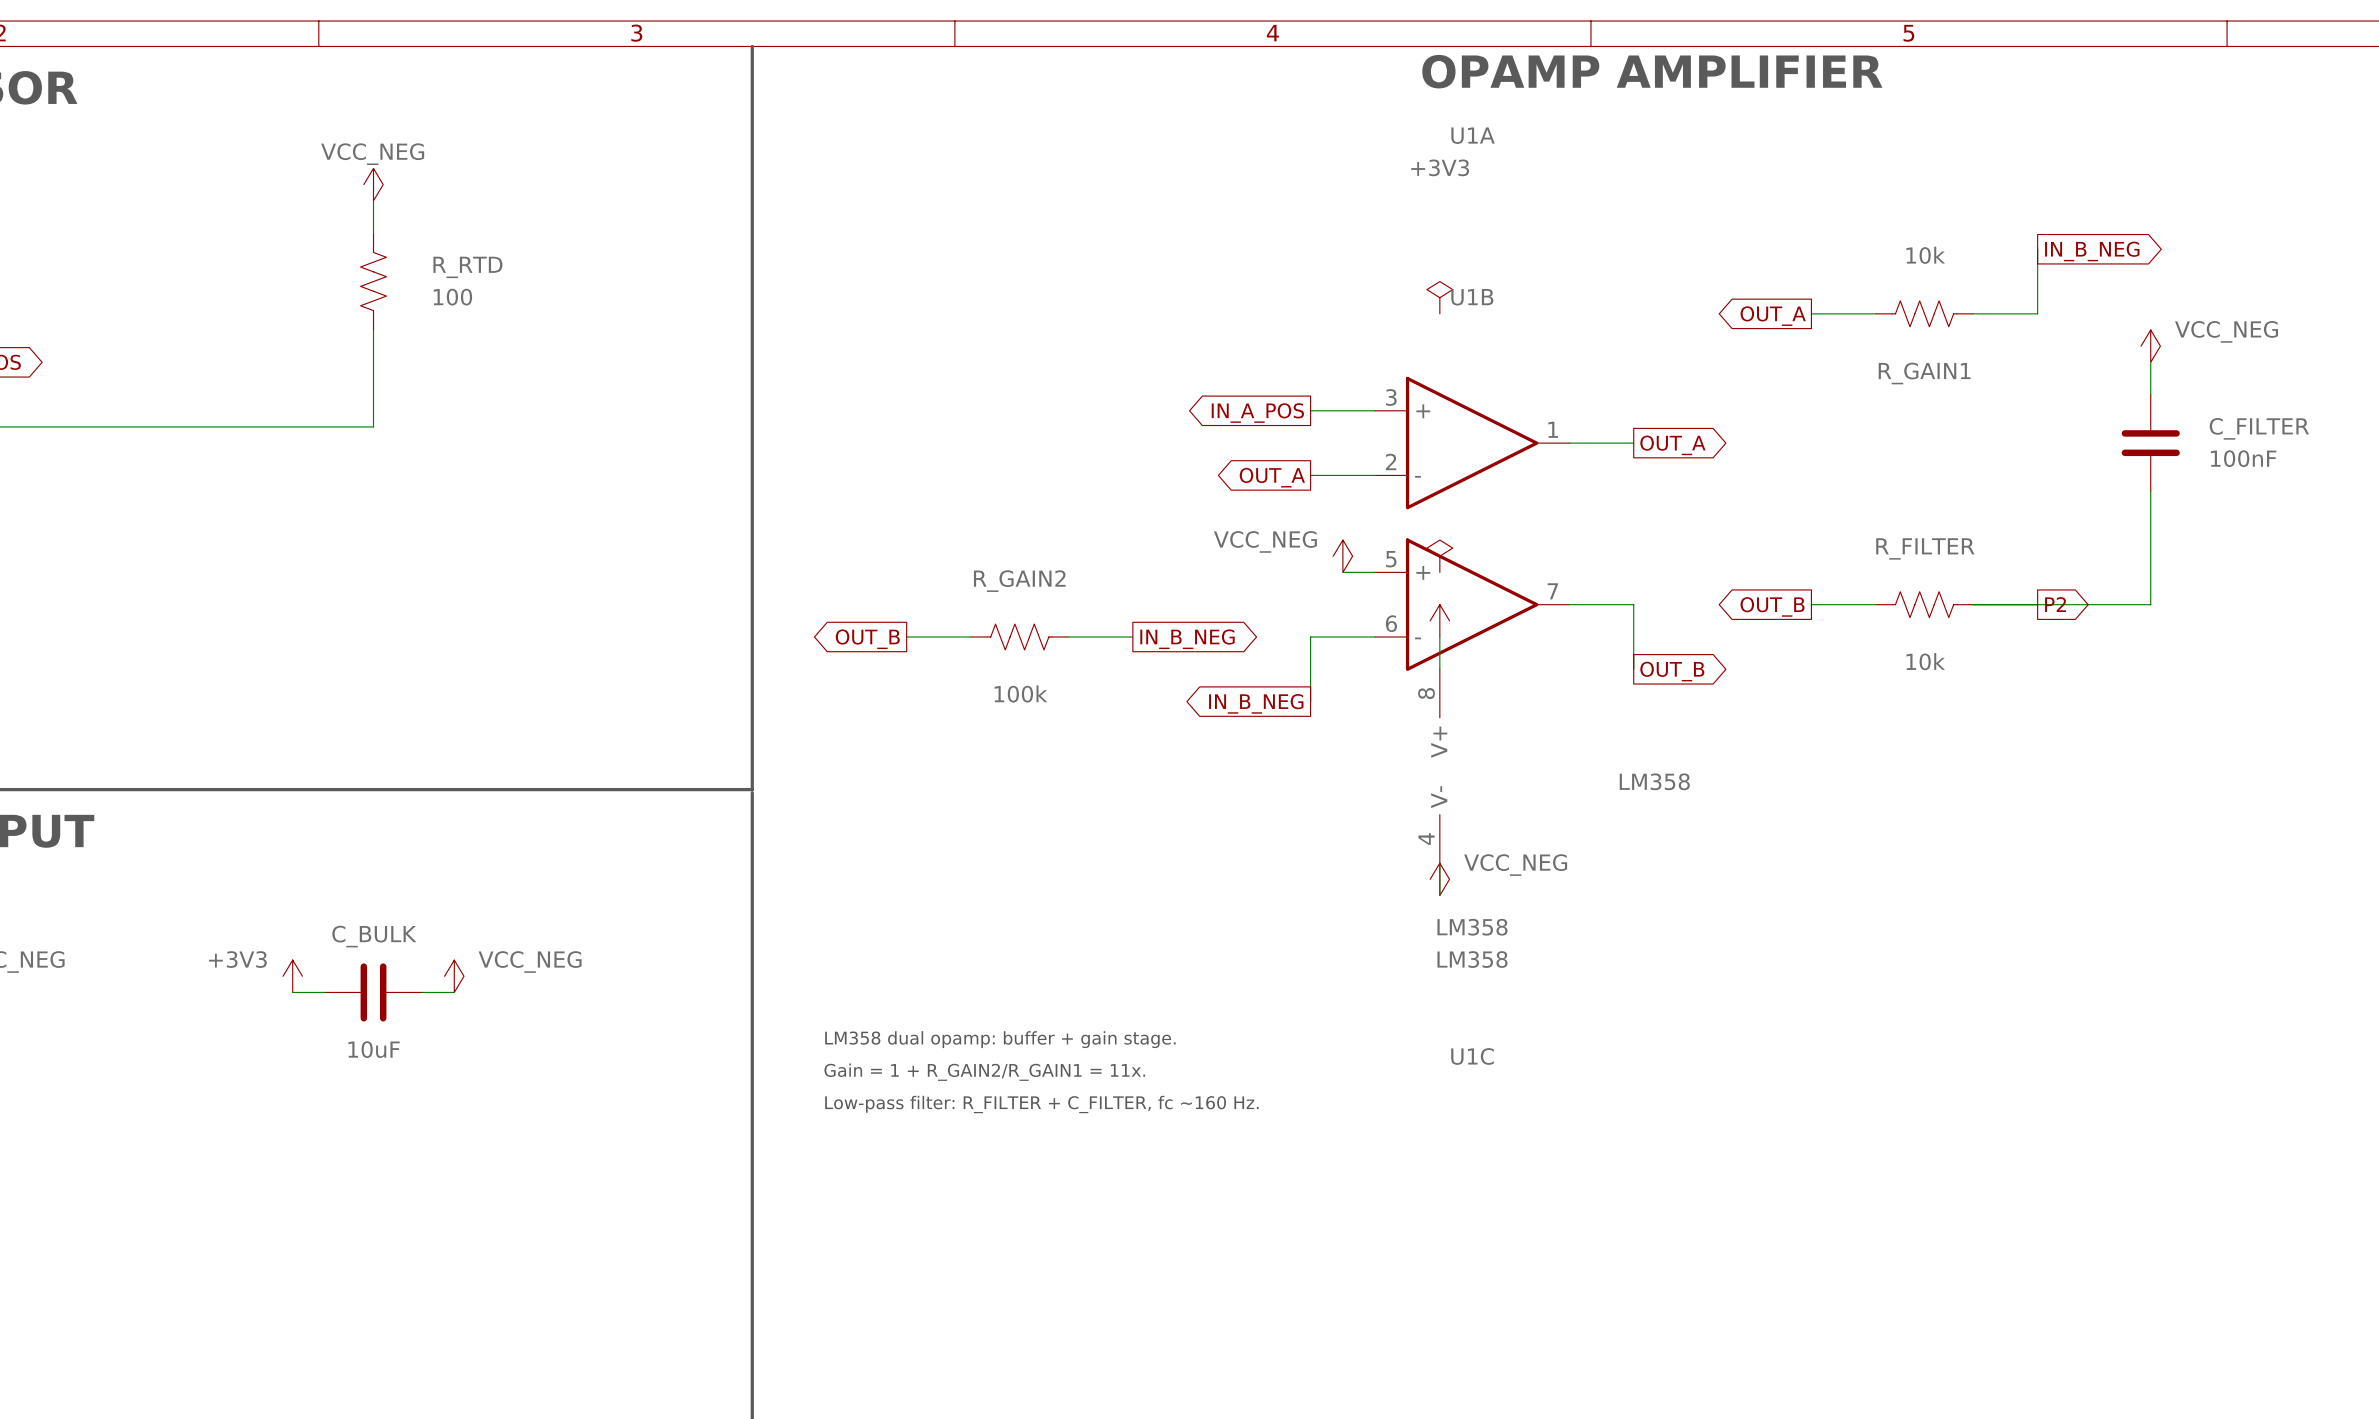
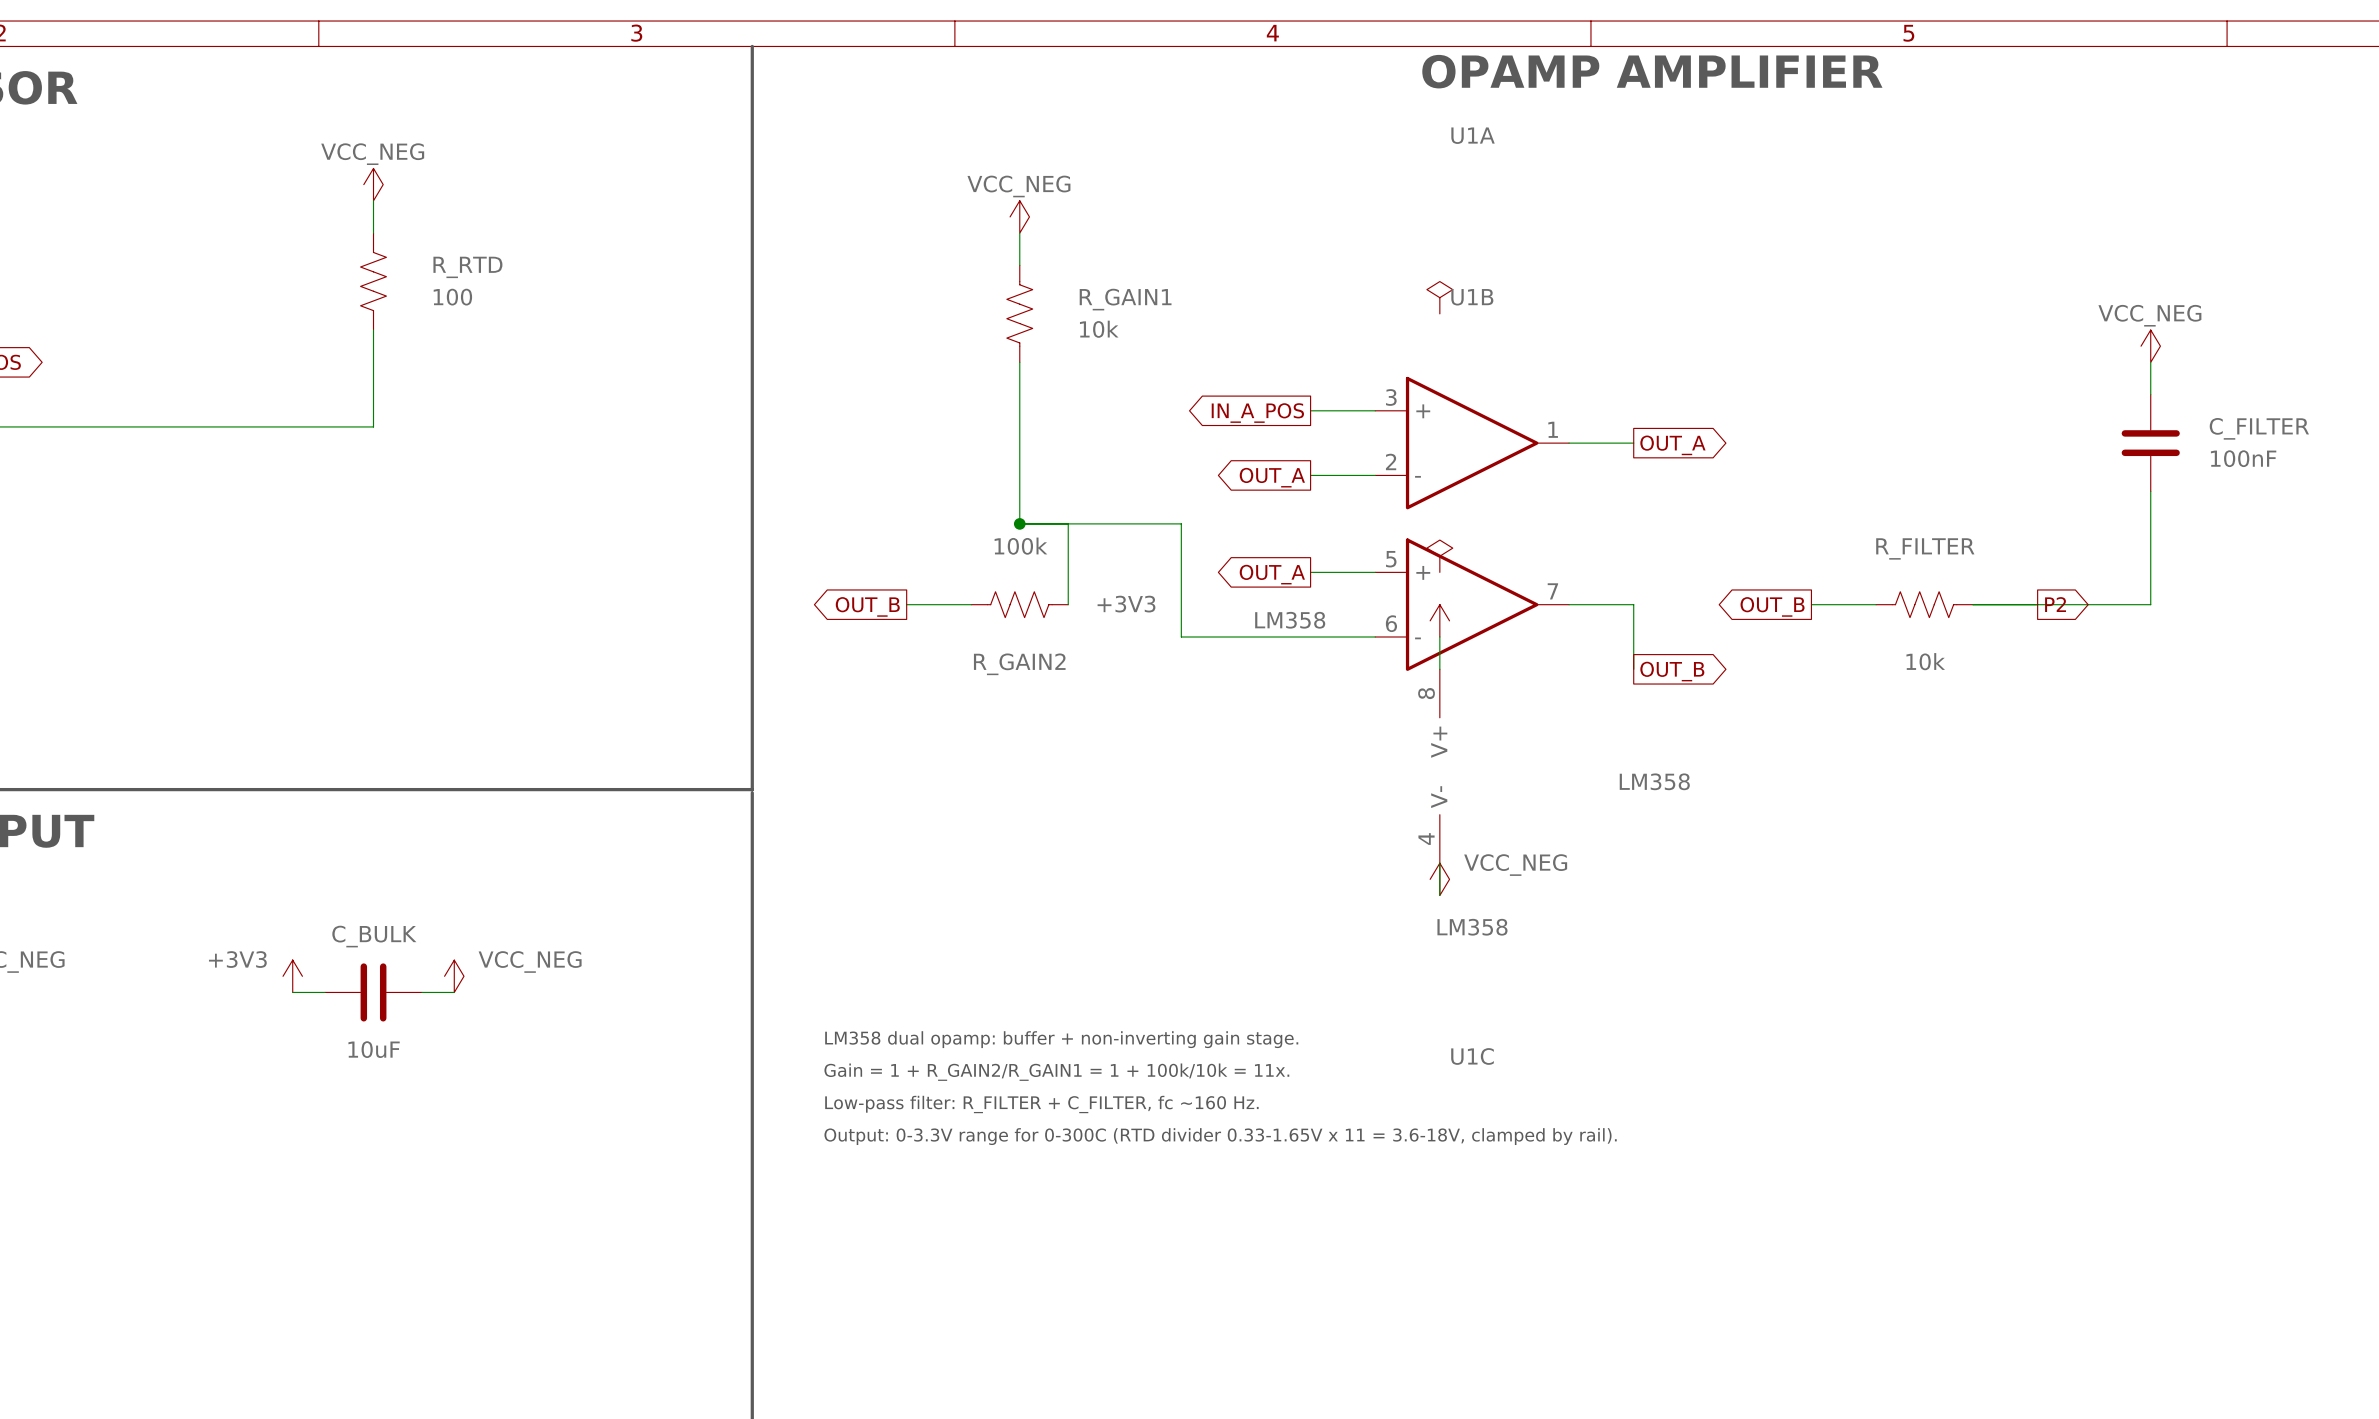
power symbol text position: +3V3 (1440, 167) -> +3V3 (1126, 604)
power symbol: none -> VCC_NEG (1019, 216)
wire: none -> (1019, 233) (1019, 265)
wire: (2037, 249) (2037, 313) (1973, 313) -> none
global label: IN_B_NEG (2092, 251) -> none
R_GAIN1 value position: 10k (1925, 255) -> 10k (1099, 329)
wire: (1811, 313) (1876, 313) -> none
R_GAIN1 rotation: 0° (1924, 313) -> 90° clockwise (1019, 313)
R_GAIN1 position: (1924, 313) -> (1019, 313)
global label: OUT_A (1773, 316) -> none
power symbol text position: VCC_NEG (2226, 331) -> VCC_NEG (2149, 315)
R_GAIN1 name position: R_GAIN1 (1924, 373) -> R_GAIN1 (1125, 299)
junction: none -> (1019, 523)
wire: none -> (1068, 523) (1068, 604)
power symbol: VCC_NEG (1342, 556) -> none
wire: none -> (1310, 572) (1342, 572)
global label: none -> OUT_A (1272, 574)
R_GAIN2 name position: R_GAIN2 (1019, 581) -> R_GAIN2 (1019, 664)
wire: (906, 637) (971, 637) -> (906, 604) (971, 604)
R_GAIN2 position: (1019, 637) -> (1019, 604)
wire: (1068, 637) (1132, 637) -> none
wire: (1310, 637) (1310, 701) -> (1310, 637) (1181, 637) (1181, 523) (1019, 523) (1019, 362)
global label position: OUT_B (867, 639) -> OUT_B (867, 606)
global label: IN_B_NEG (1187, 639) -> none
R_GAIN2 value position: 100k (1020, 693) -> 100k (1020, 546)
global label: IN_B_NEG (1256, 703) -> none
U1B value position: LM358 (1472, 959) -> LM358 (1290, 620)
text: LM358 dual opamp: buffer + gain stage. (1000, 1039) -> LM358 dual opamp: buffer + non-inverting gain stage. (1061, 1039)
text: Gain = 1 + R_GAIN2/R_GAIN1 = 11x. (984, 1072) -> Gain = 1 + R_GAIN2/R_GAIN1 = 1 + 100k/10k = 11x. (1056, 1072)
text: none -> Output: 0-3.3V range for 0-300C (RTD divider 0.33-1.65V x 11 = 3.6-18V, clamped by rail). (1220, 1136)

